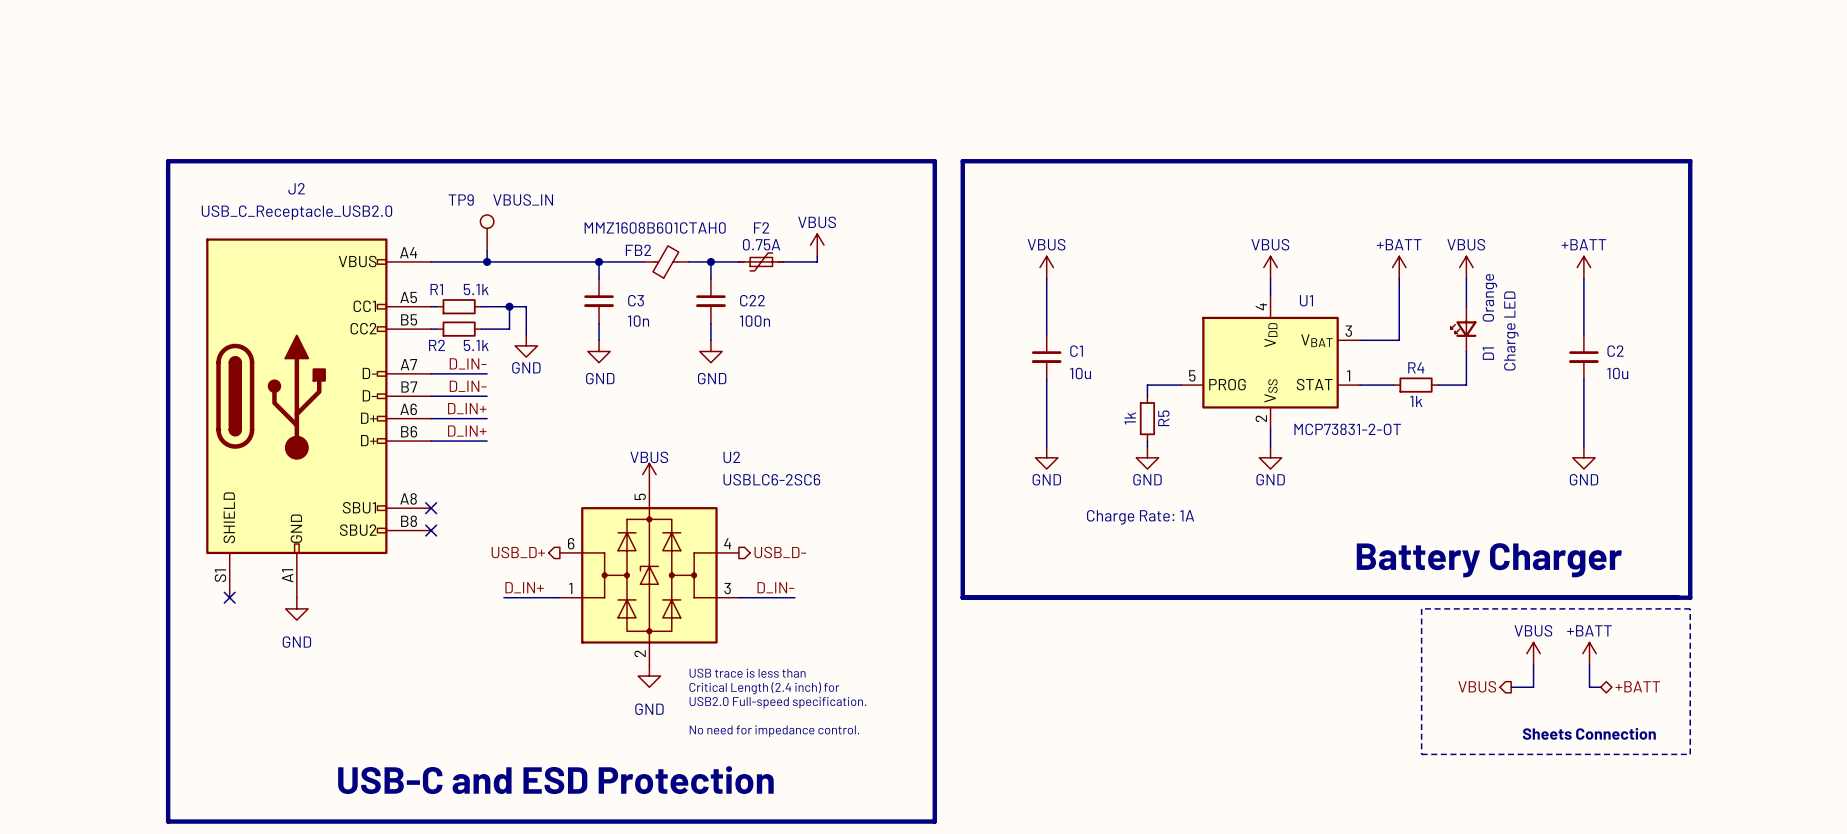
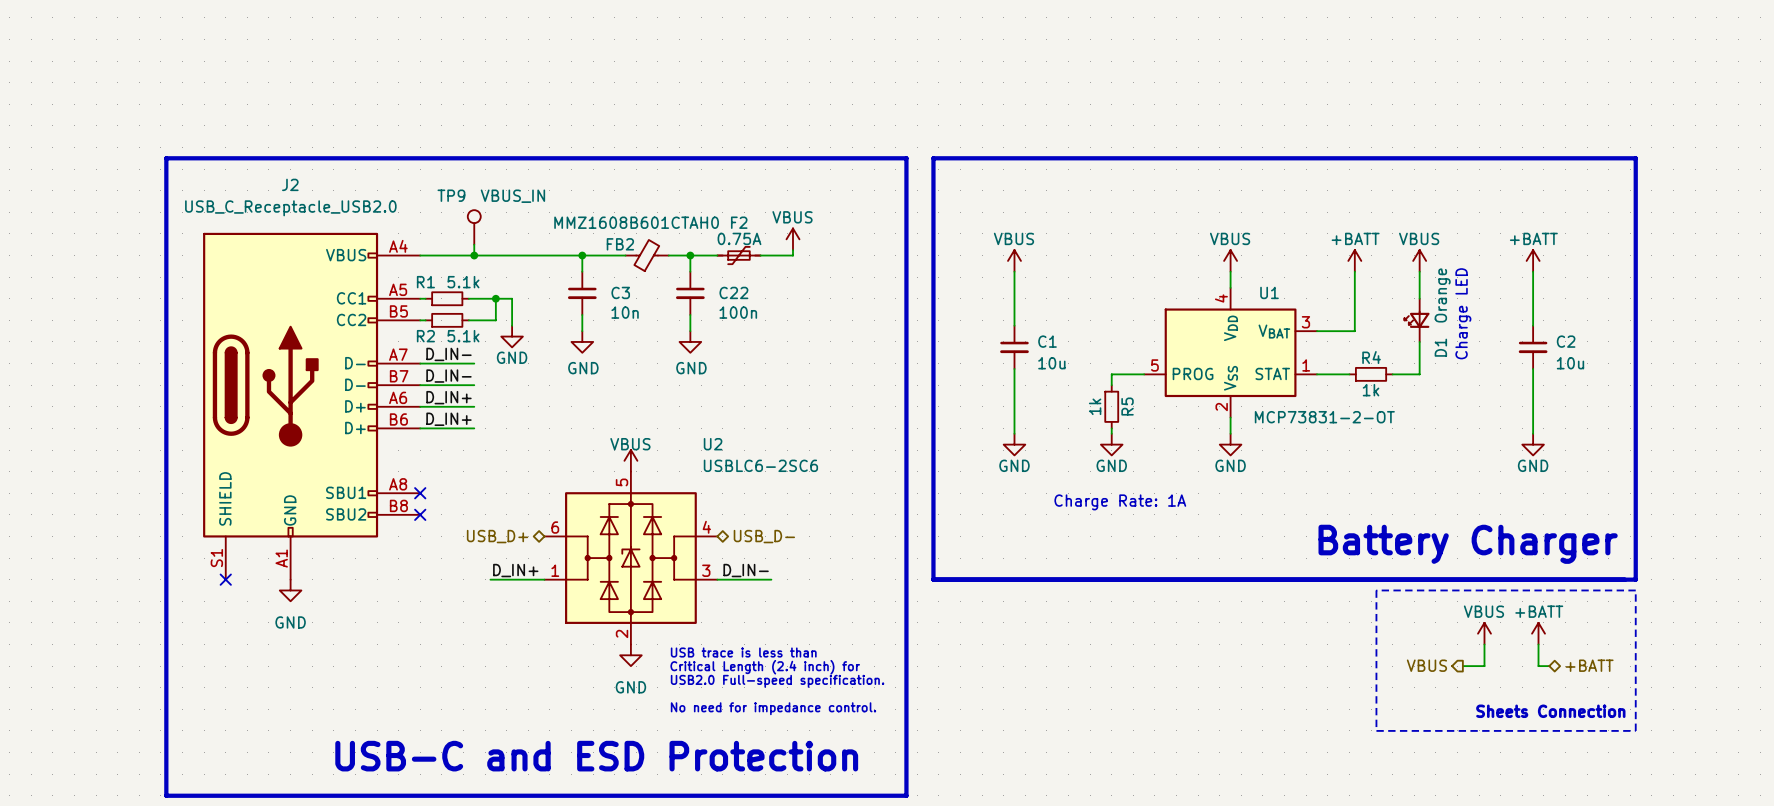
hierarchical label shape: output (518, 552) -> bidirectional (497, 536)
hierarchical label shape: output (780, 552) -> bidirectional (764, 536)

